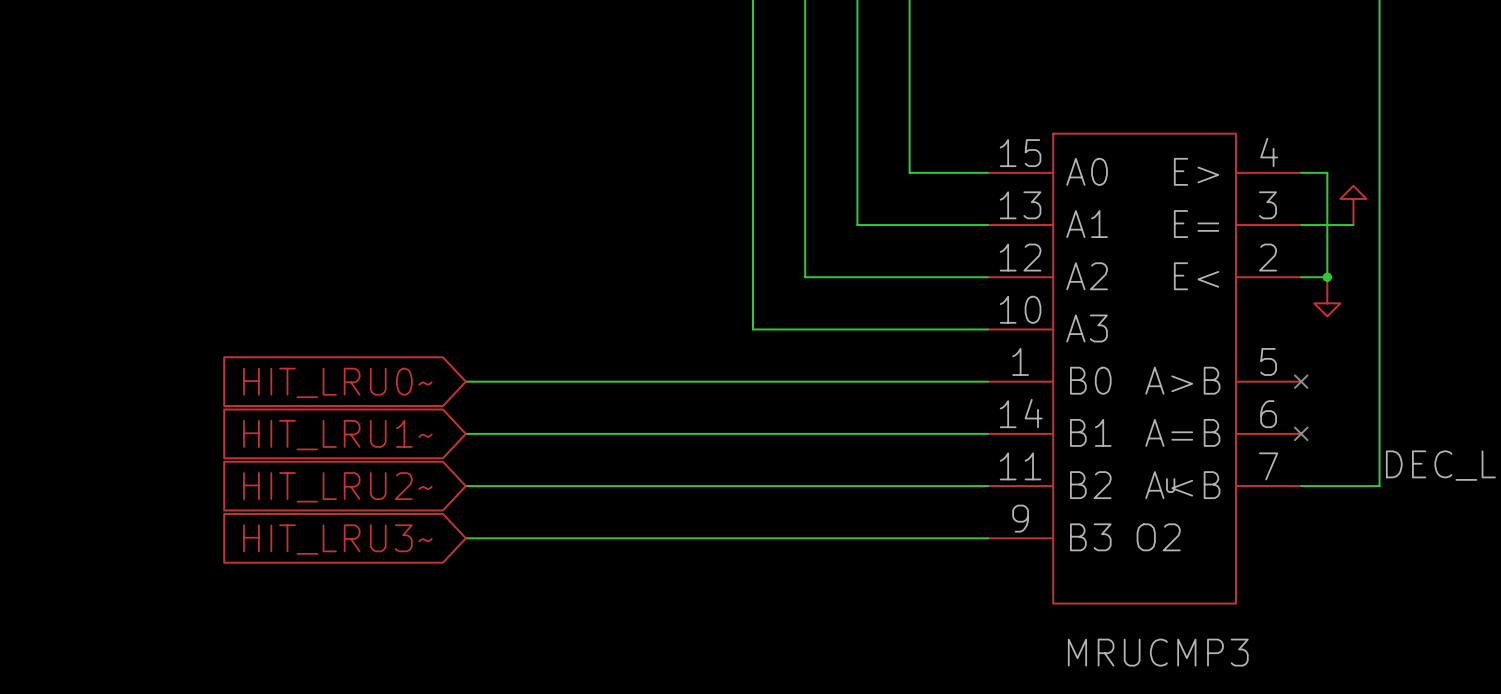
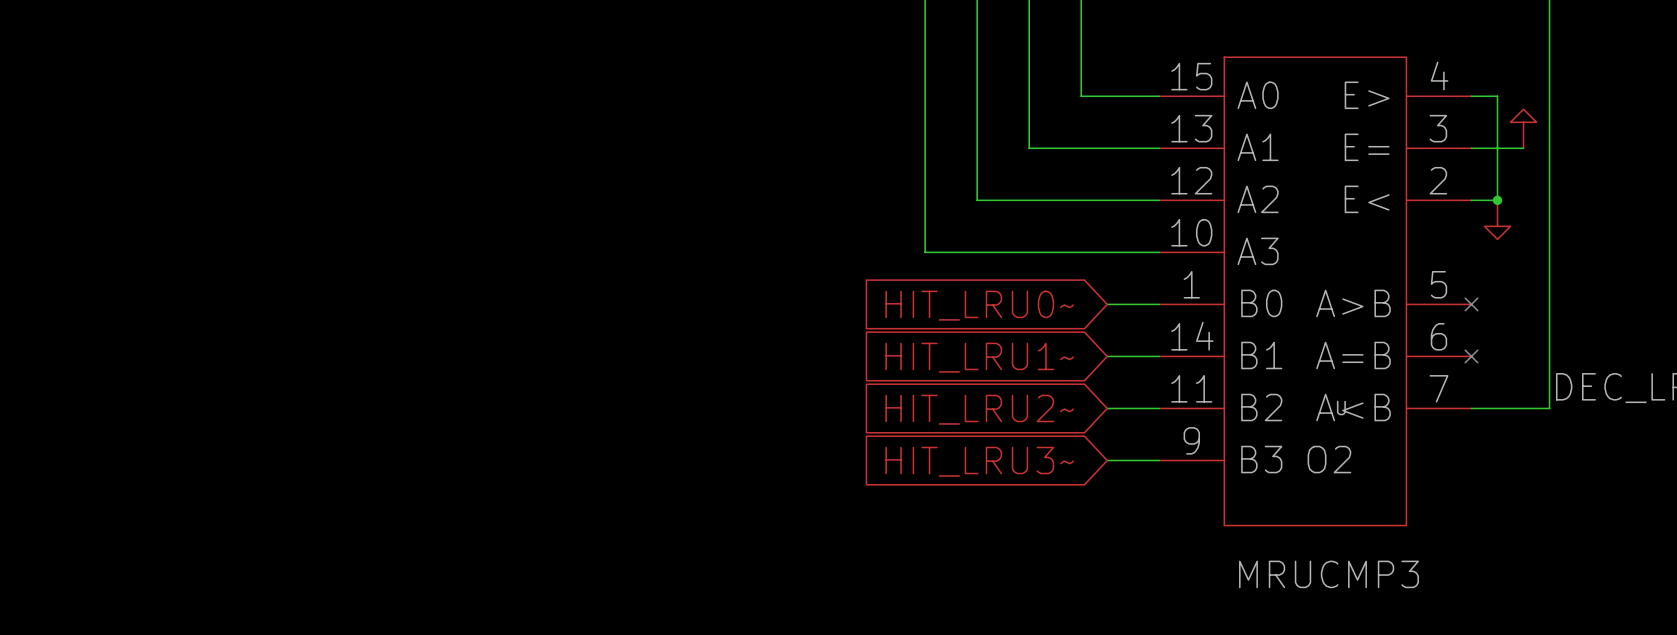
wire: (465, 381) (935, 381) -> none
global label: HIT_LRU0~ (337, 382) -> none
global label: none -> HIT_LRU0~ (979, 305)
wire: (465, 433) (935, 433) -> none
global label: HIT_LRU1~ (337, 435) -> none
global label: none -> HIT_LRU1~ (979, 357)
wire: (465, 486) (935, 486) -> none
global label: HIT_LRU2~ (337, 487) -> none
global label: none -> HIT_LRU2~ (979, 409)
wire: (465, 538) (935, 538) -> none
global label: HIT_LRU3~ (337, 539) -> none
global label: none -> HIT_LRU3~ (979, 461)

